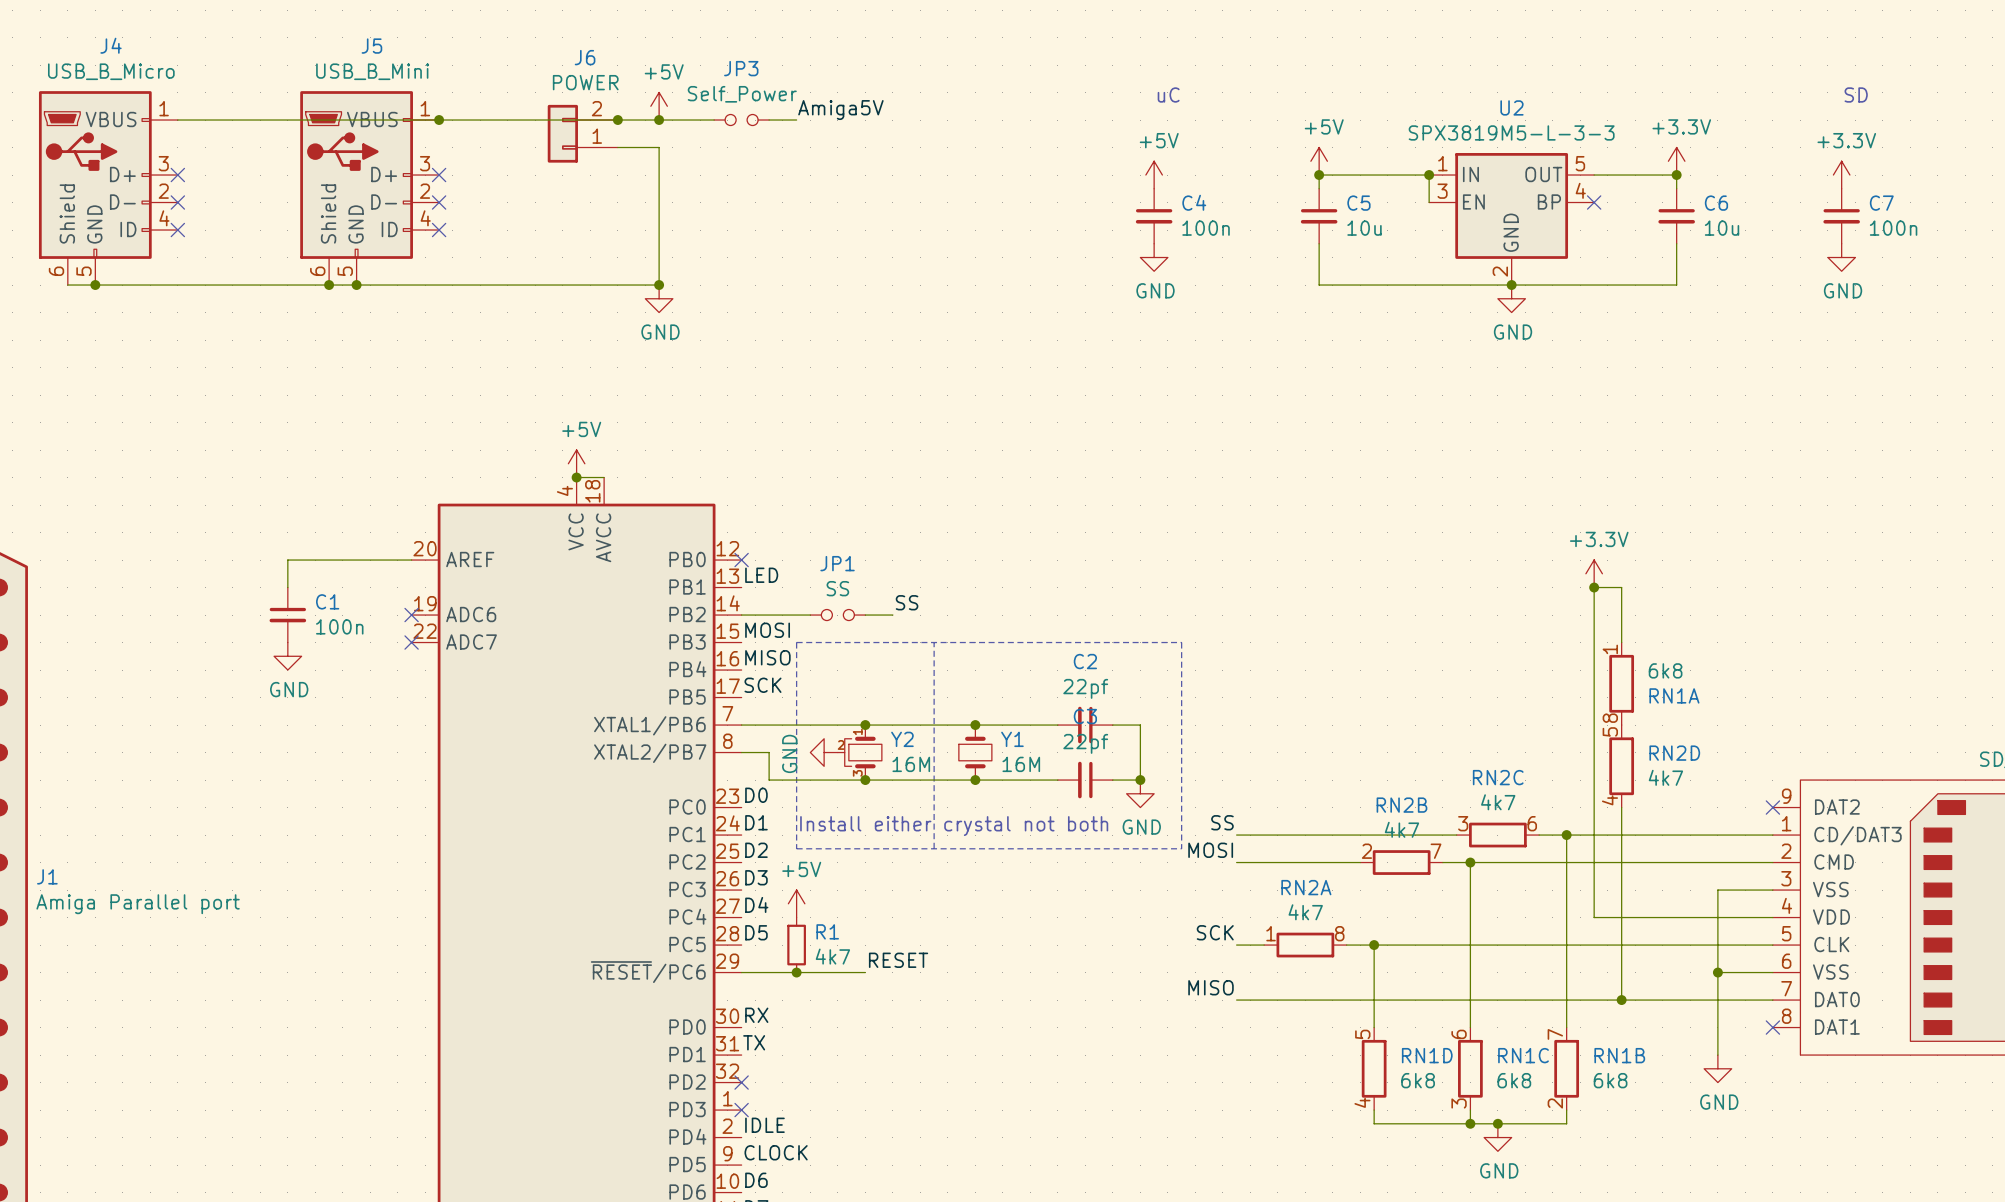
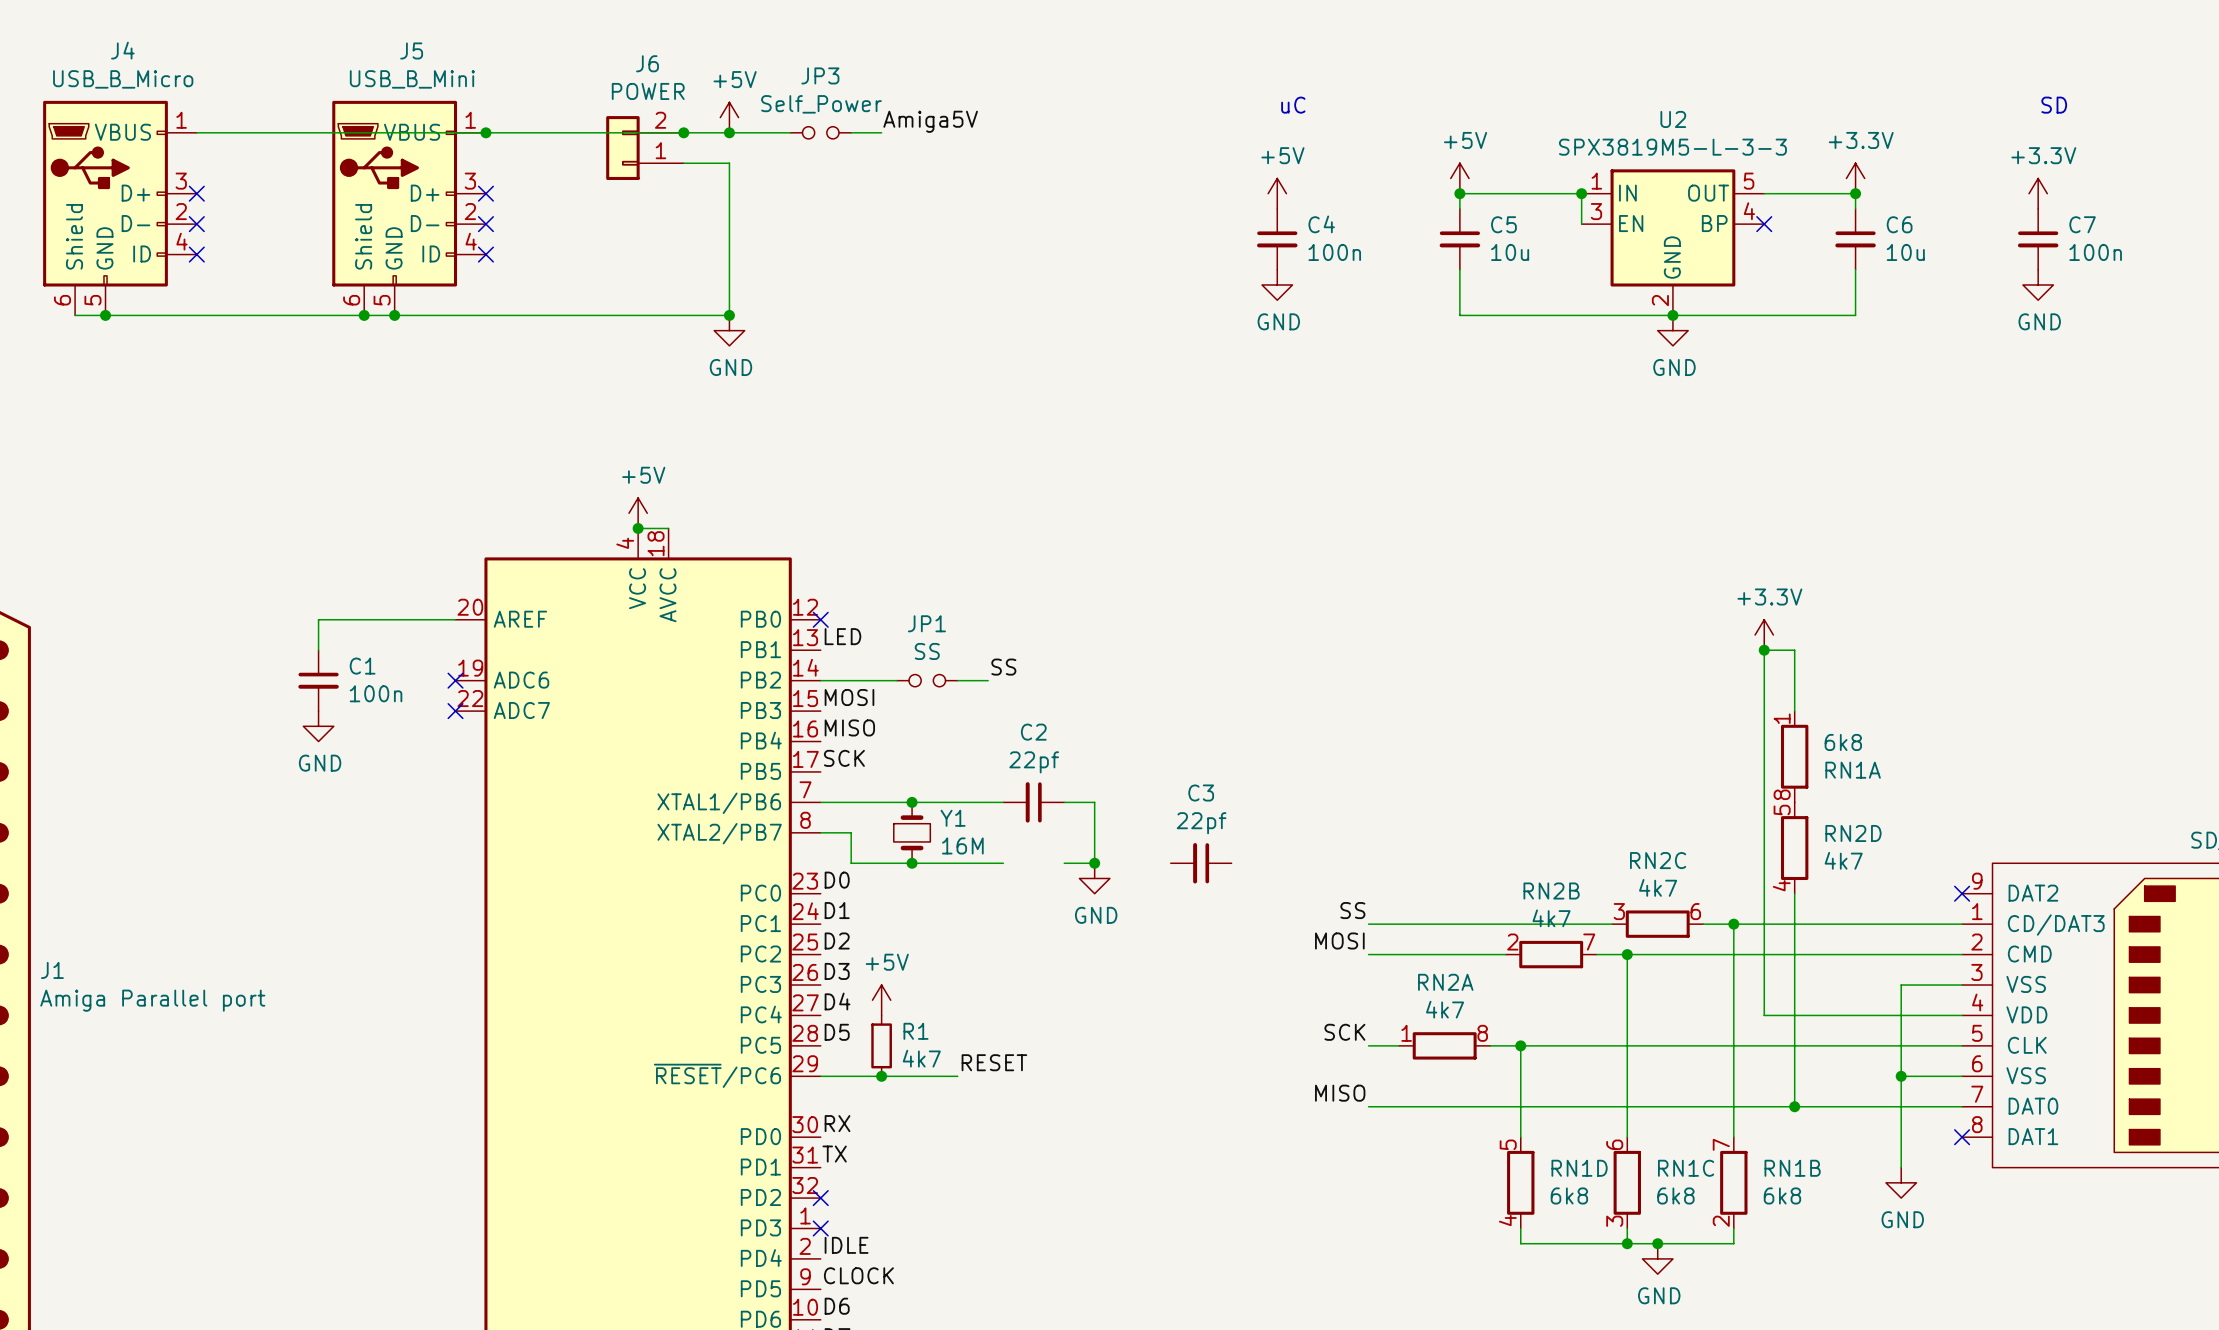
line: (796, 642) (796, 848) (1181, 848) (1181, 642) (796, 642) -> none
line: (934, 642) (934, 848) -> none
junction: none -> (912, 802)
junction: (865, 725) -> none
junction: (975, 725) -> none
wire: (989, 725) (1057, 725) -> (1094, 802) (1094, 863)
C2 position: (1085, 725) -> (1033, 802)
wire: (1112, 725) (1140, 725) (1140, 780) (1112, 780) -> none
power symbol: GND (824, 752) -> none
Y2: 16M (859, 752) -> none
Y1 position: (975, 752) -> (912, 832)
junction: none -> (912, 863)
junction: (865, 780) -> none
wire: (906, 780) (961, 780) -> none
junction position: (975, 780) -> (1094, 863)
wire: (989, 780) (1057, 780) -> none
junction: (1140, 780) -> none
power symbol: none -> GND (1094, 878)
power symbol: GND (1140, 793) -> none
text: Install either crystal not both (954, 826) -> none

